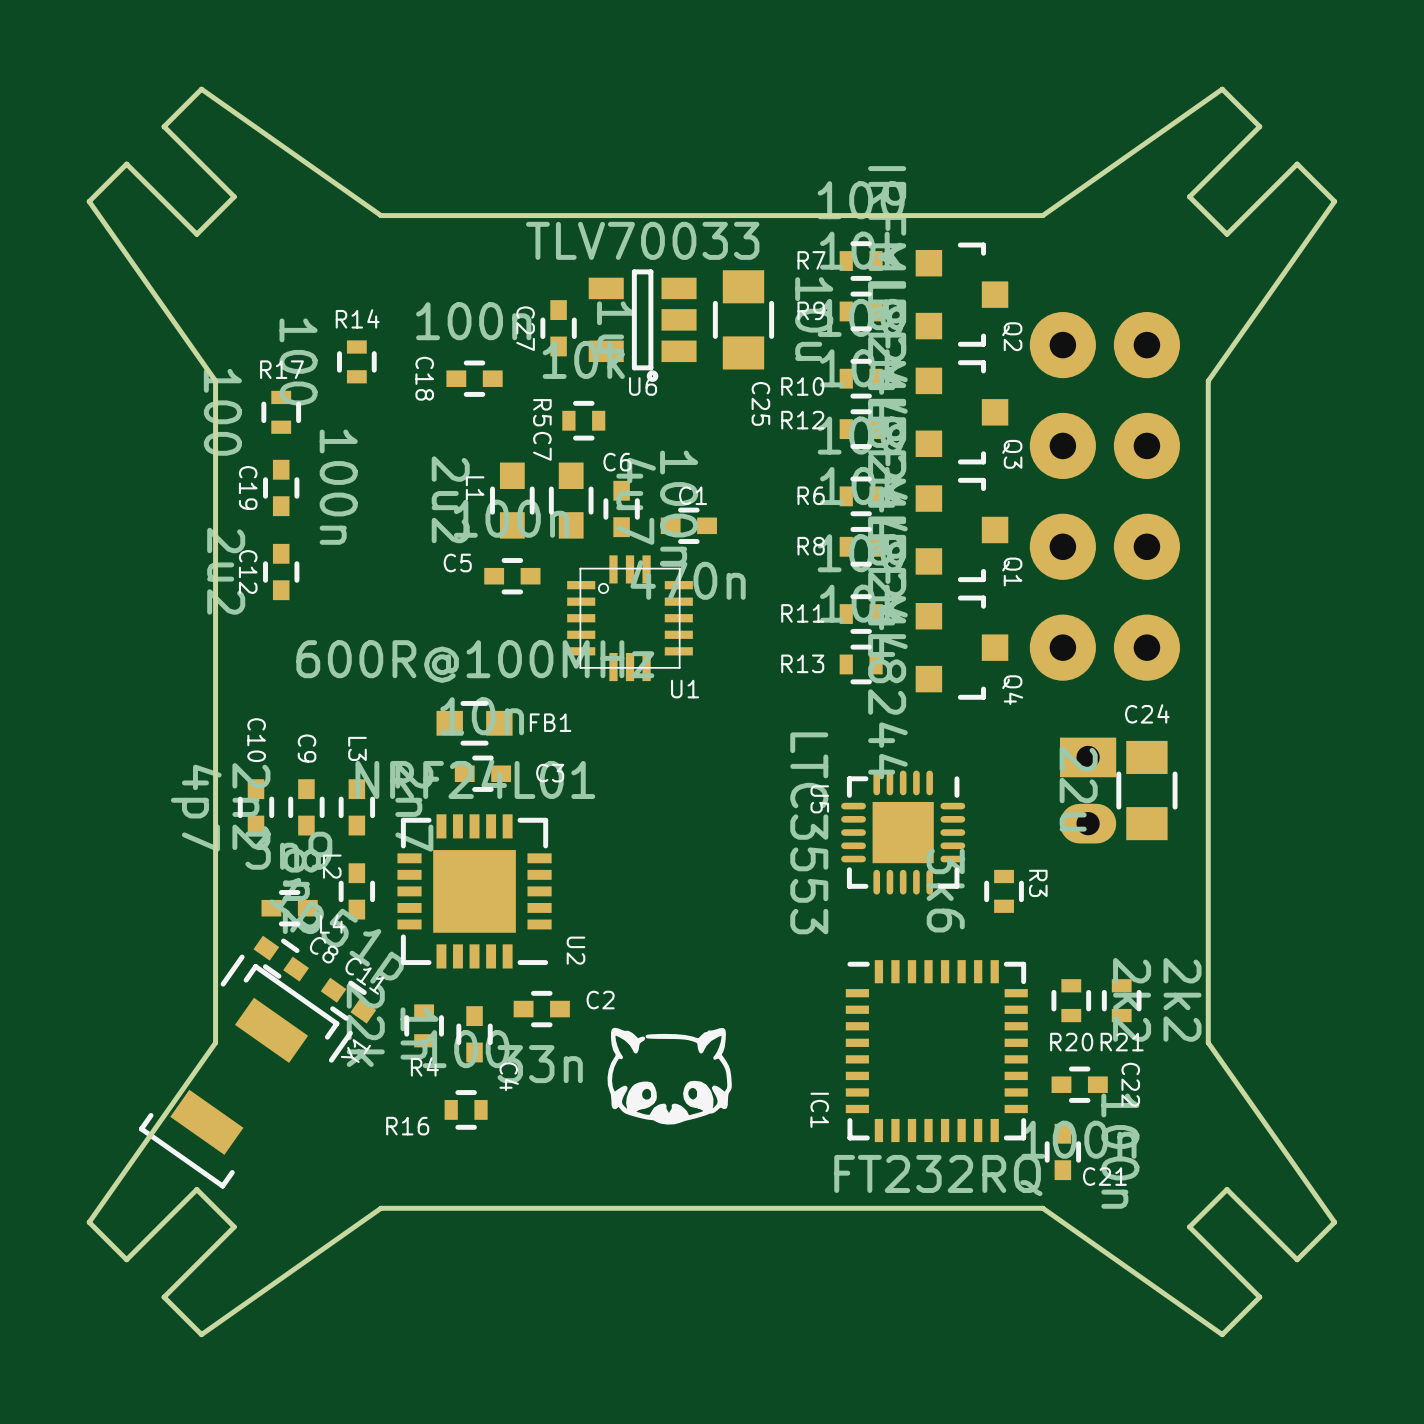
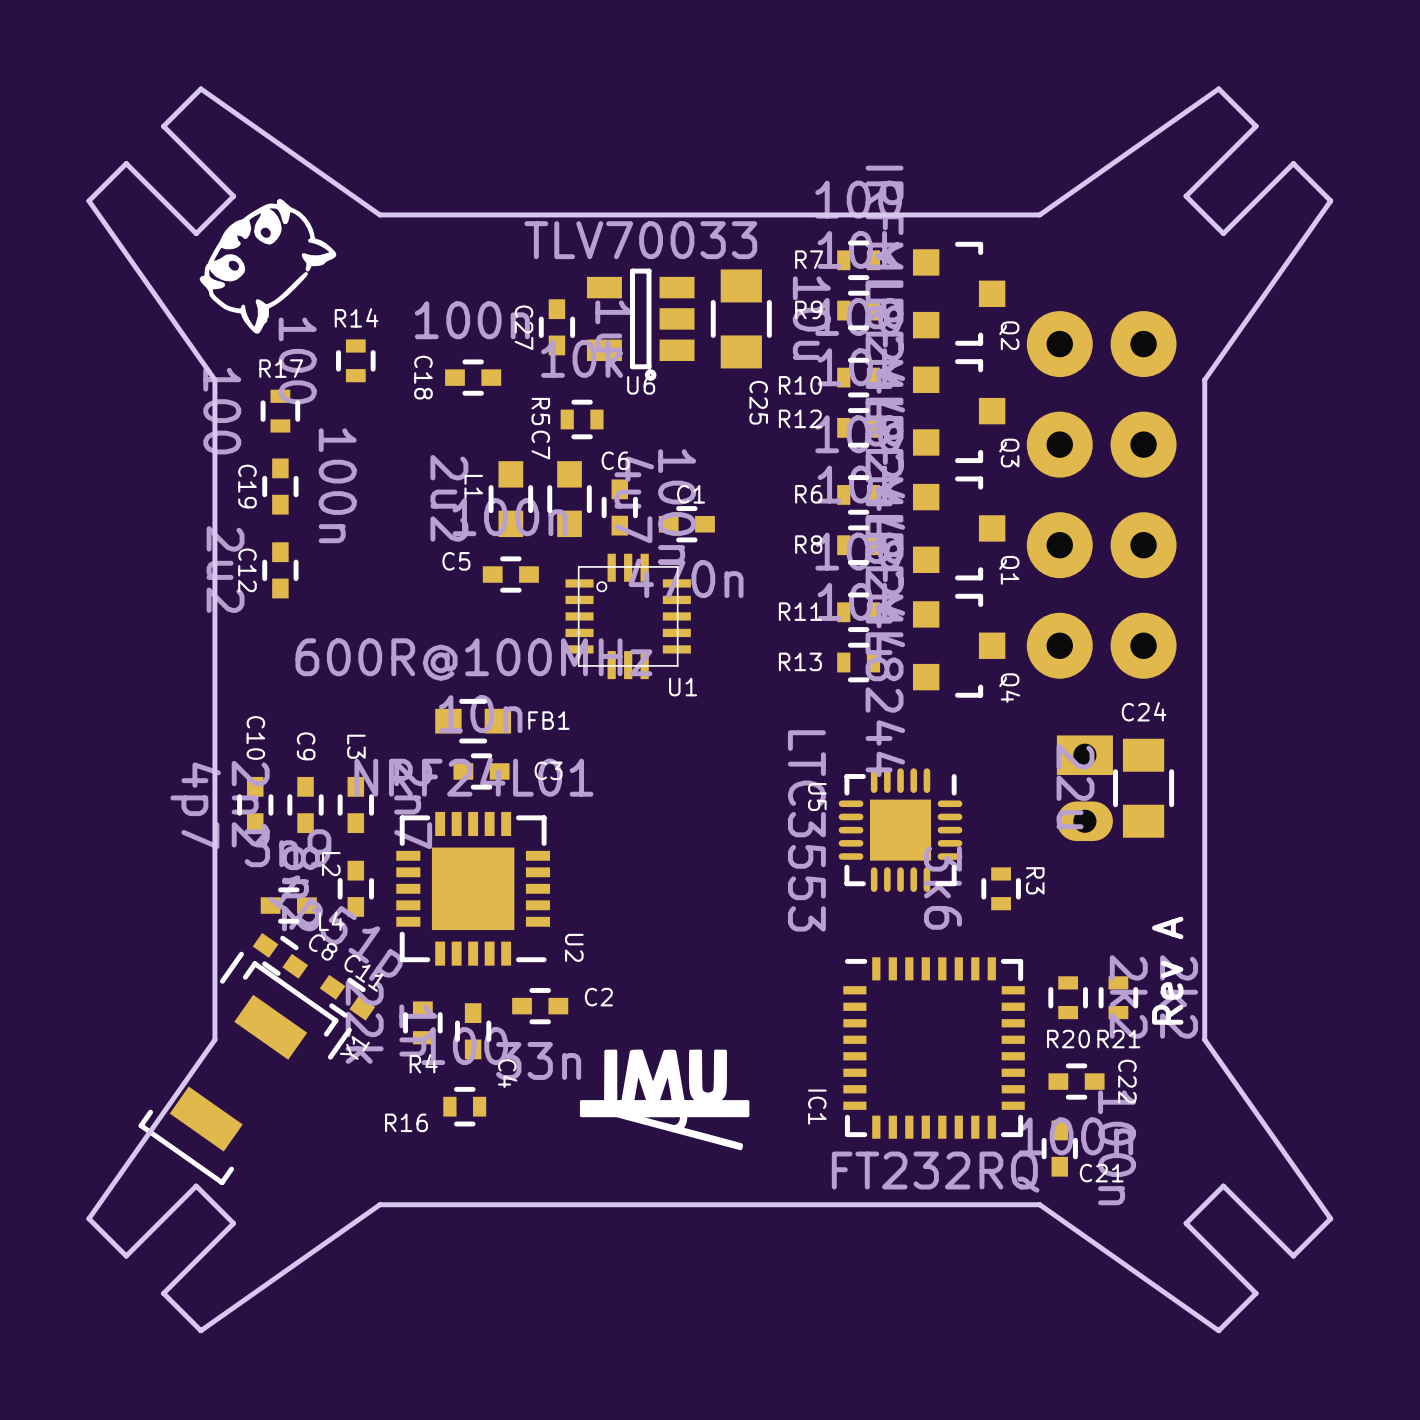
drawing: none -> [199, 198, 337, 334]
text: none -> Rev A (1167, 970)
drawing shape: [607, 1027, 732, 1125] -> [579, 1049, 750, 1151]

